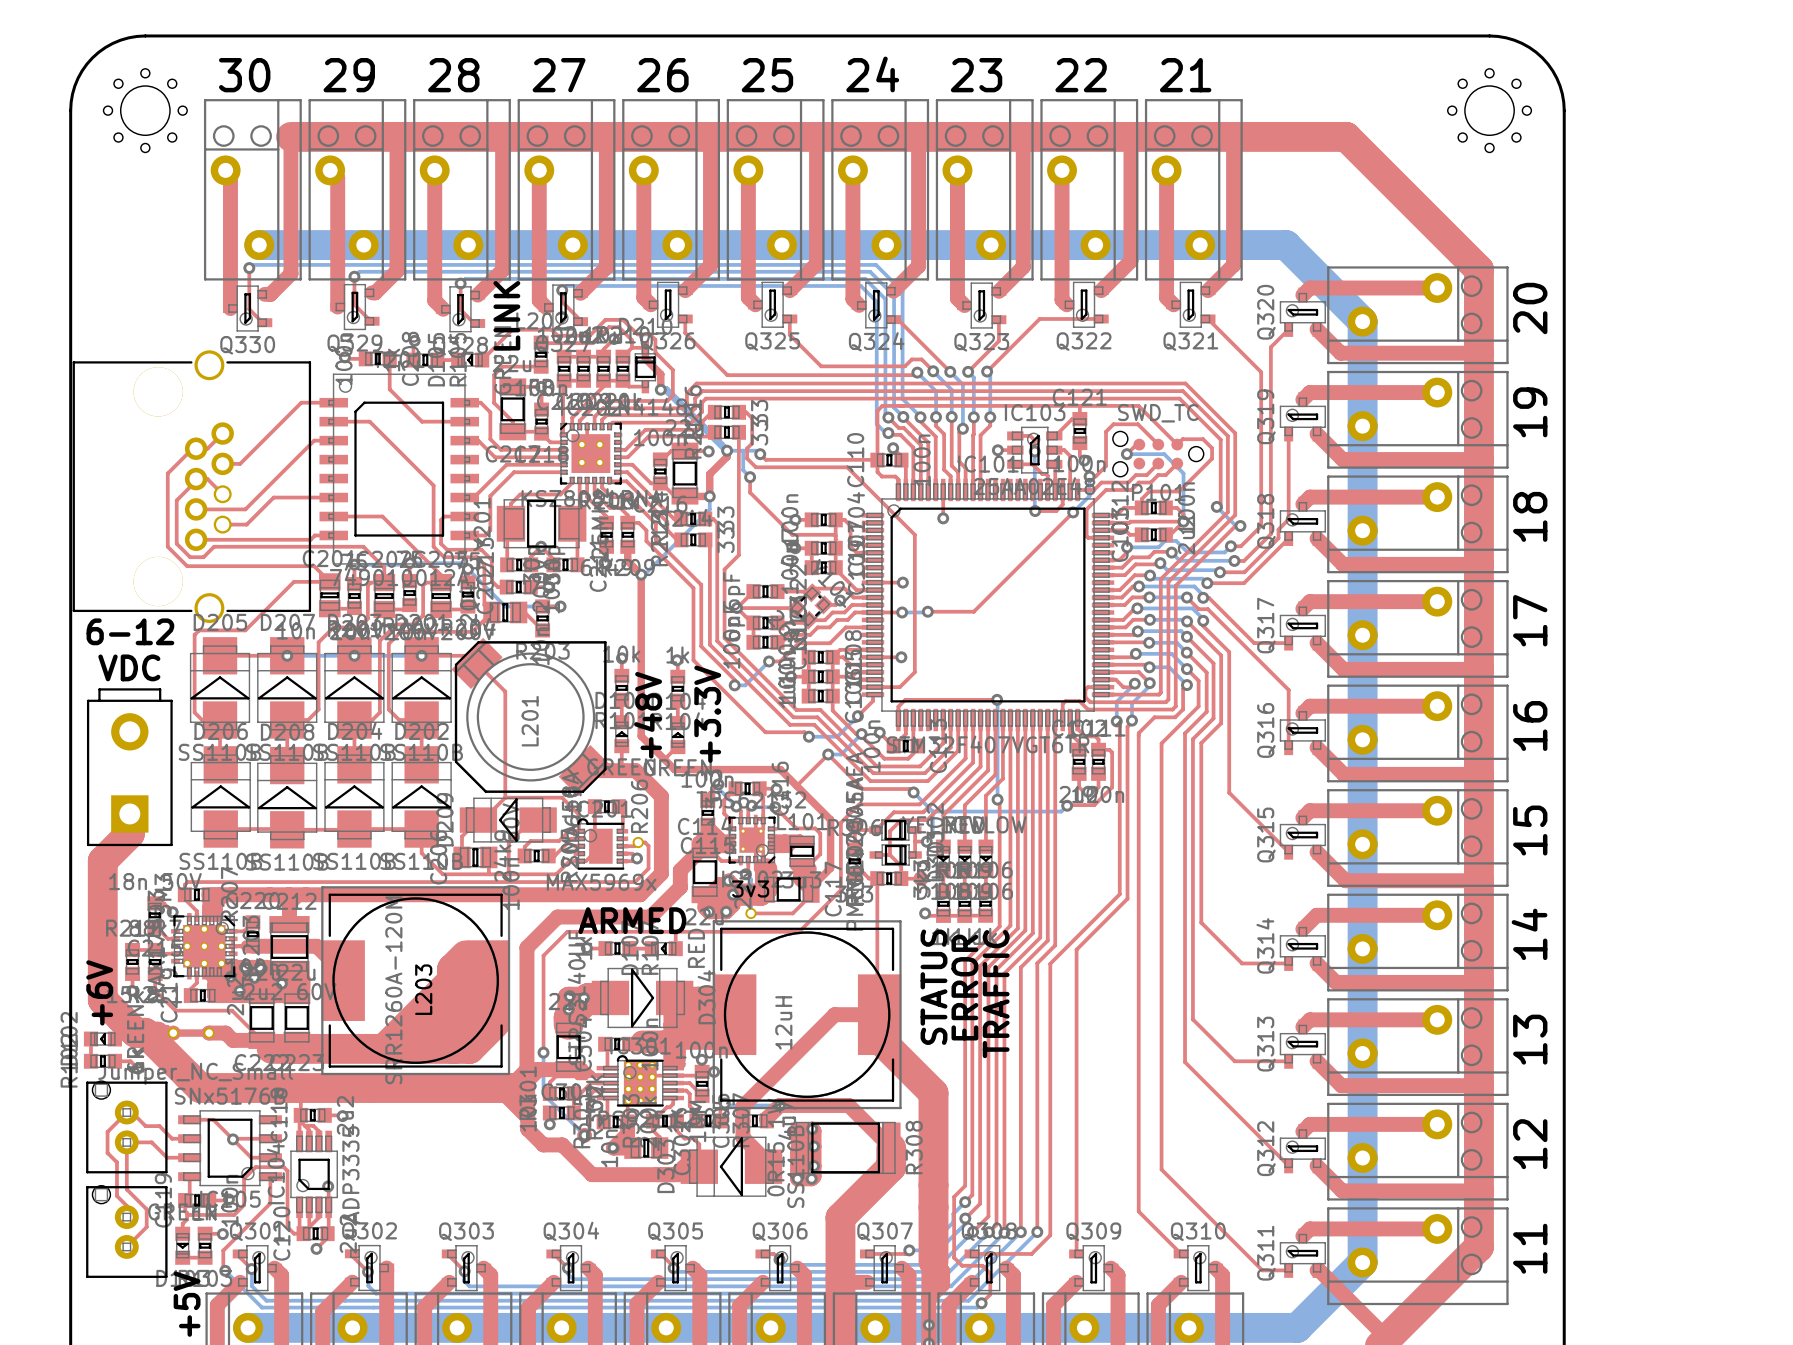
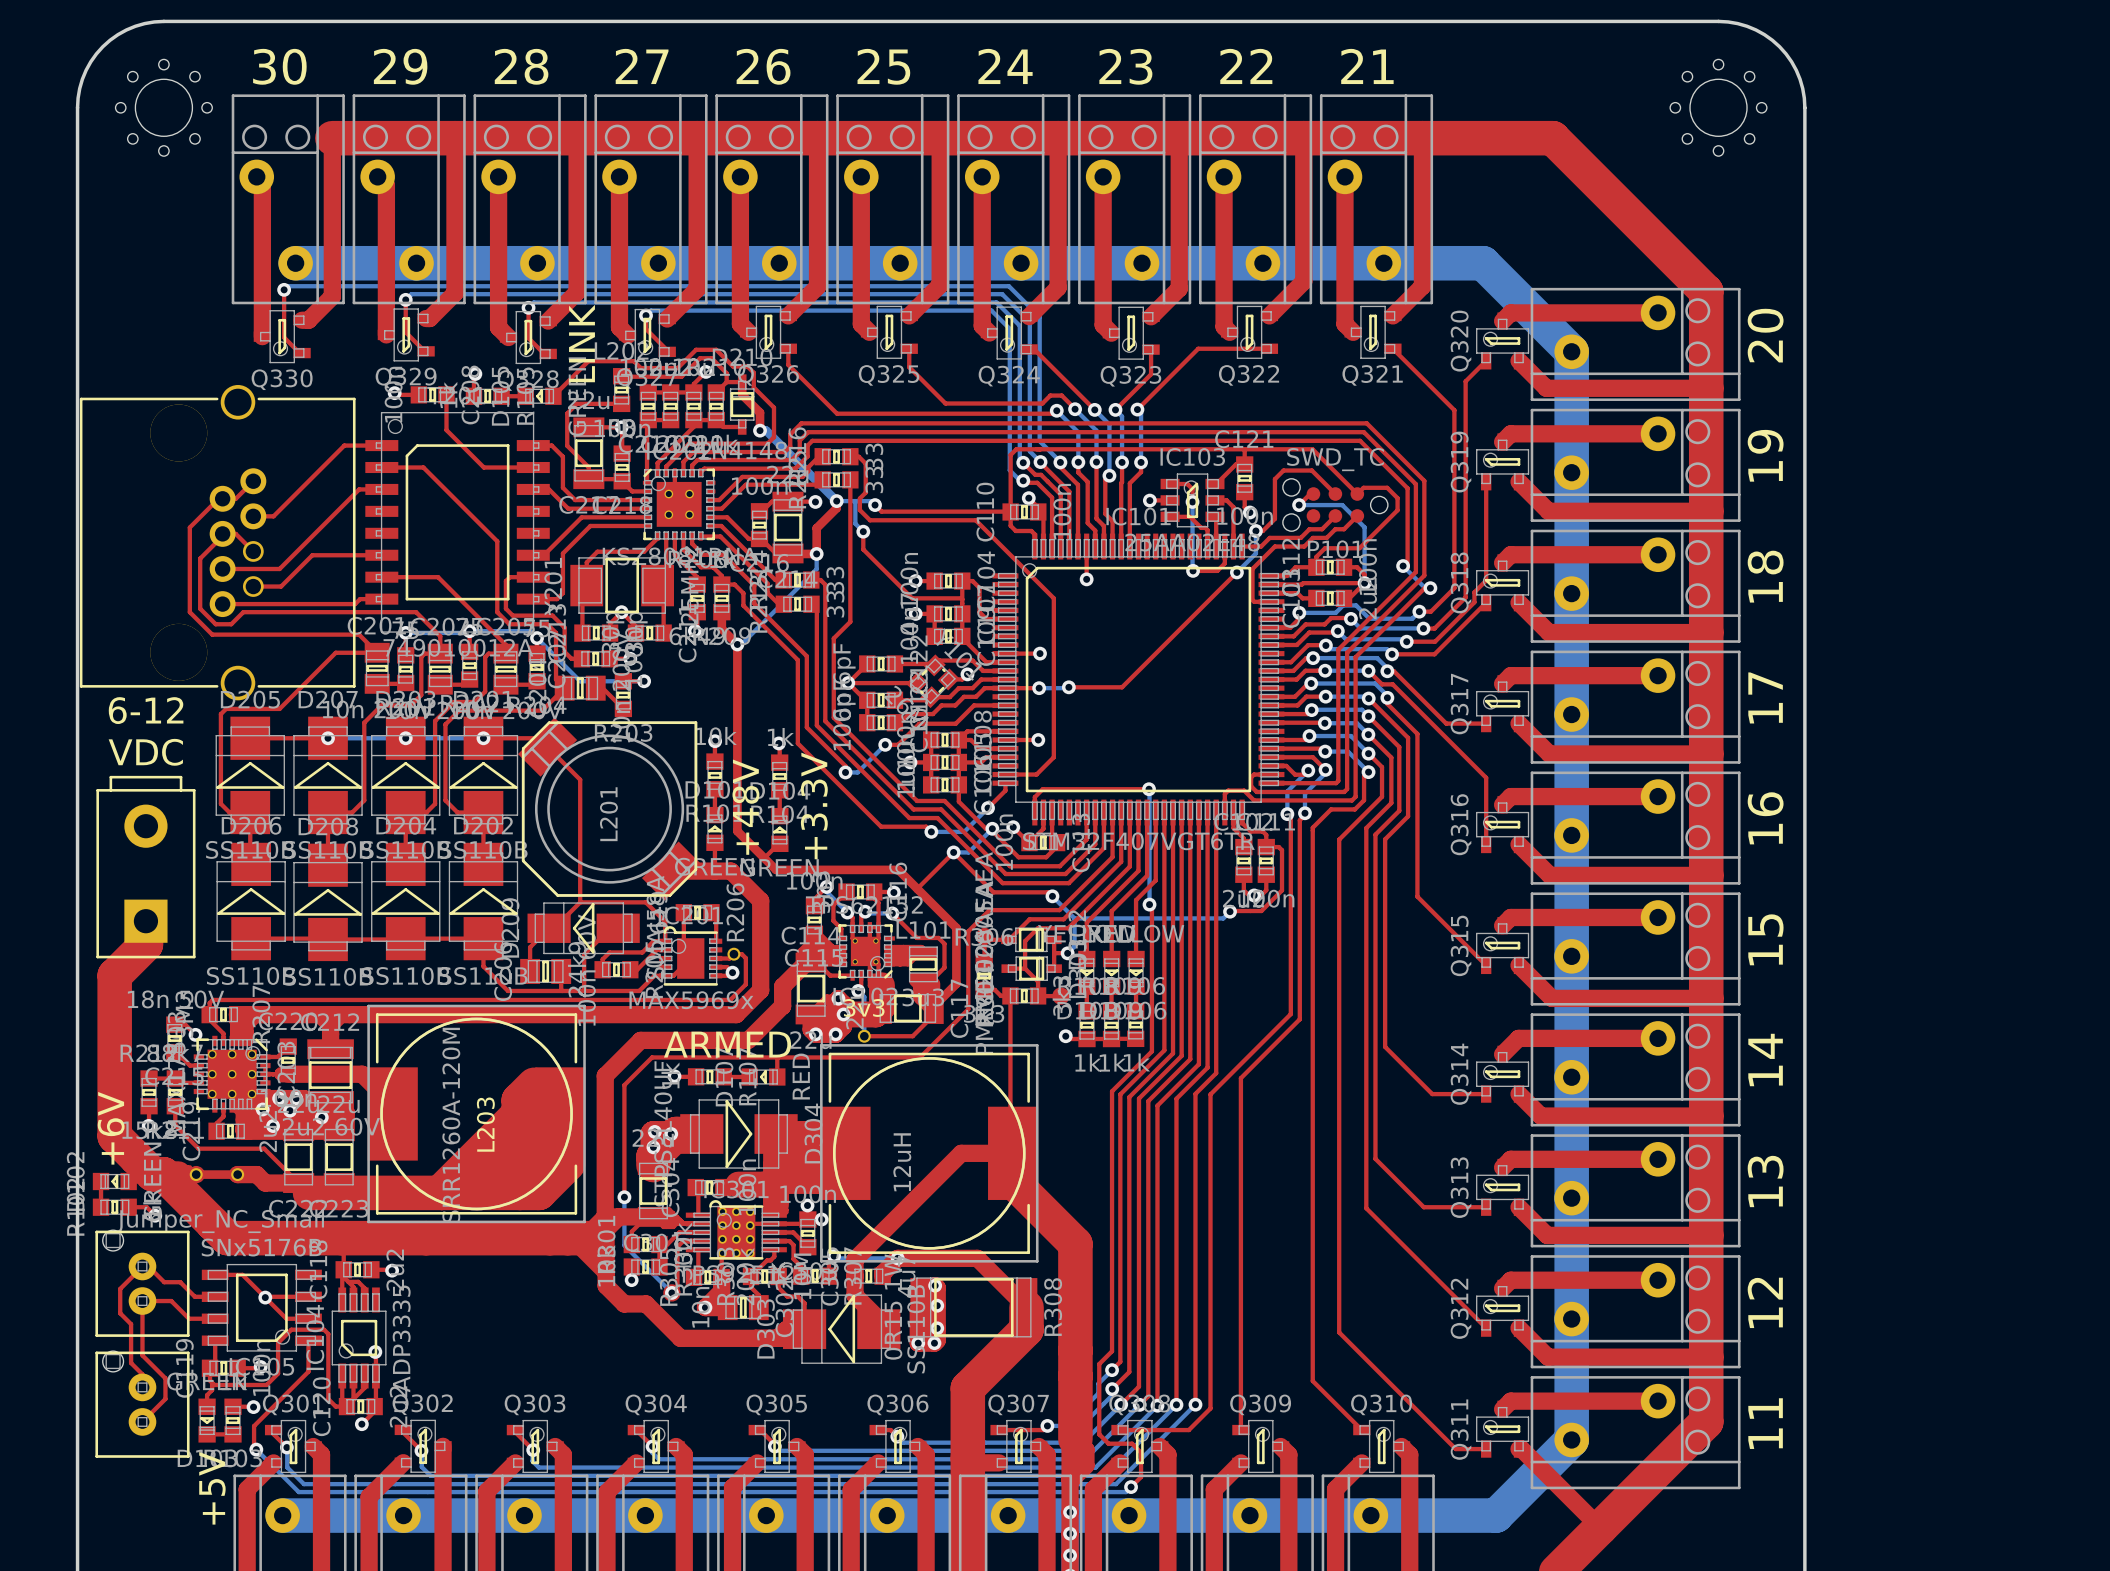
text: STATUS (934, 987) -> none
text: ERROR (964, 987) -> none
text: TRAFFIC (996, 994) -> none

